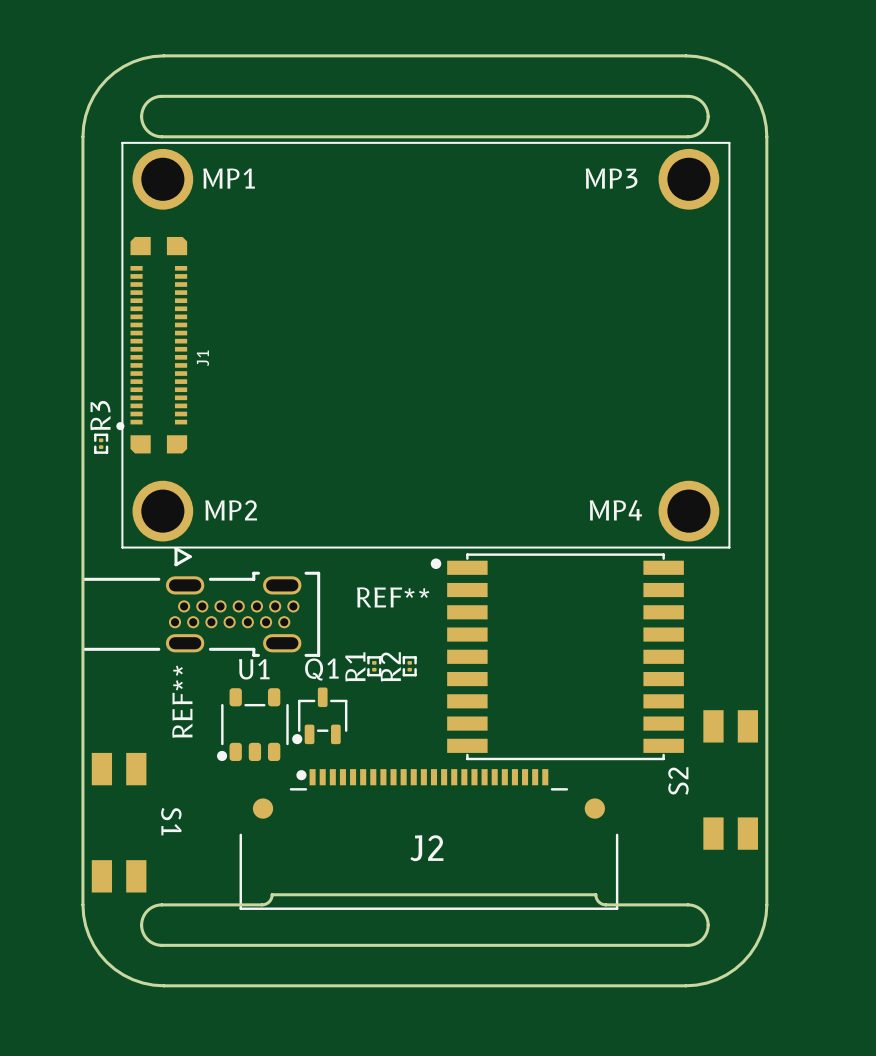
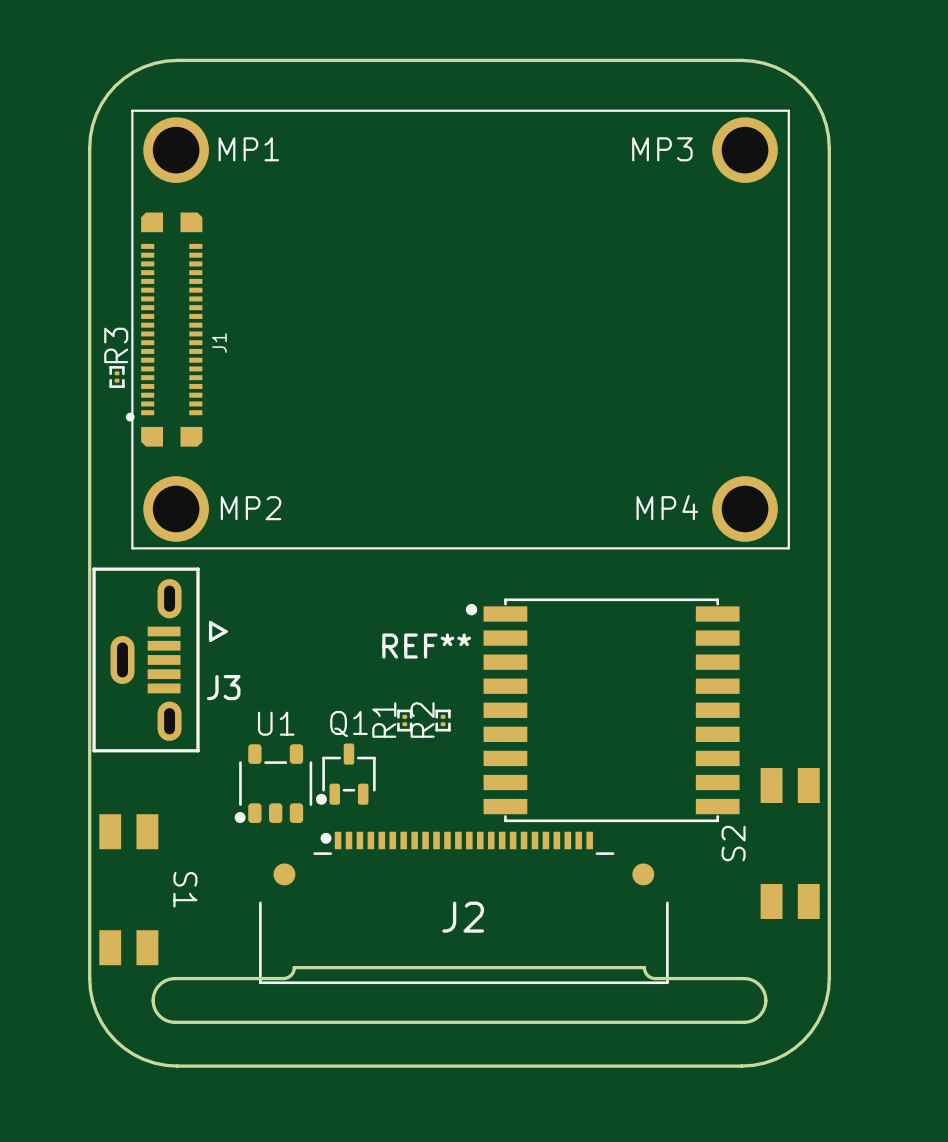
board edge: (161, 96) (687, 96) (696, 98) (702, 102) (706, 107) (708, 116) (706, 125) (702, 130) (694, 135) (687, 136) (161, 136) (155, 135) (147, 130) (142, 123) (141, 116) (143, 107) (147, 102) (153, 98) (161, 96) -> none
line: (122, 142) (729, 142) -> (132, 154) (132, 110) (788, 110) (788, 154)
MP1 position: (162, 179) -> (176, 150)
MP3 position: (688, 179) -> (745, 150)
J1 position: (151, 345) -> (164, 329)
R3 position: (101, 443) -> (117, 376)
line: (122, 507) (122, 547) (729, 547) (729, 507) -> (132, 548) (788, 548)
MP2 position: (162, 511) -> (176, 508)
MP4 position: (688, 511) -> (745, 508)
REF**: (201, 601) -> none
J3: none -> (159, 659)

